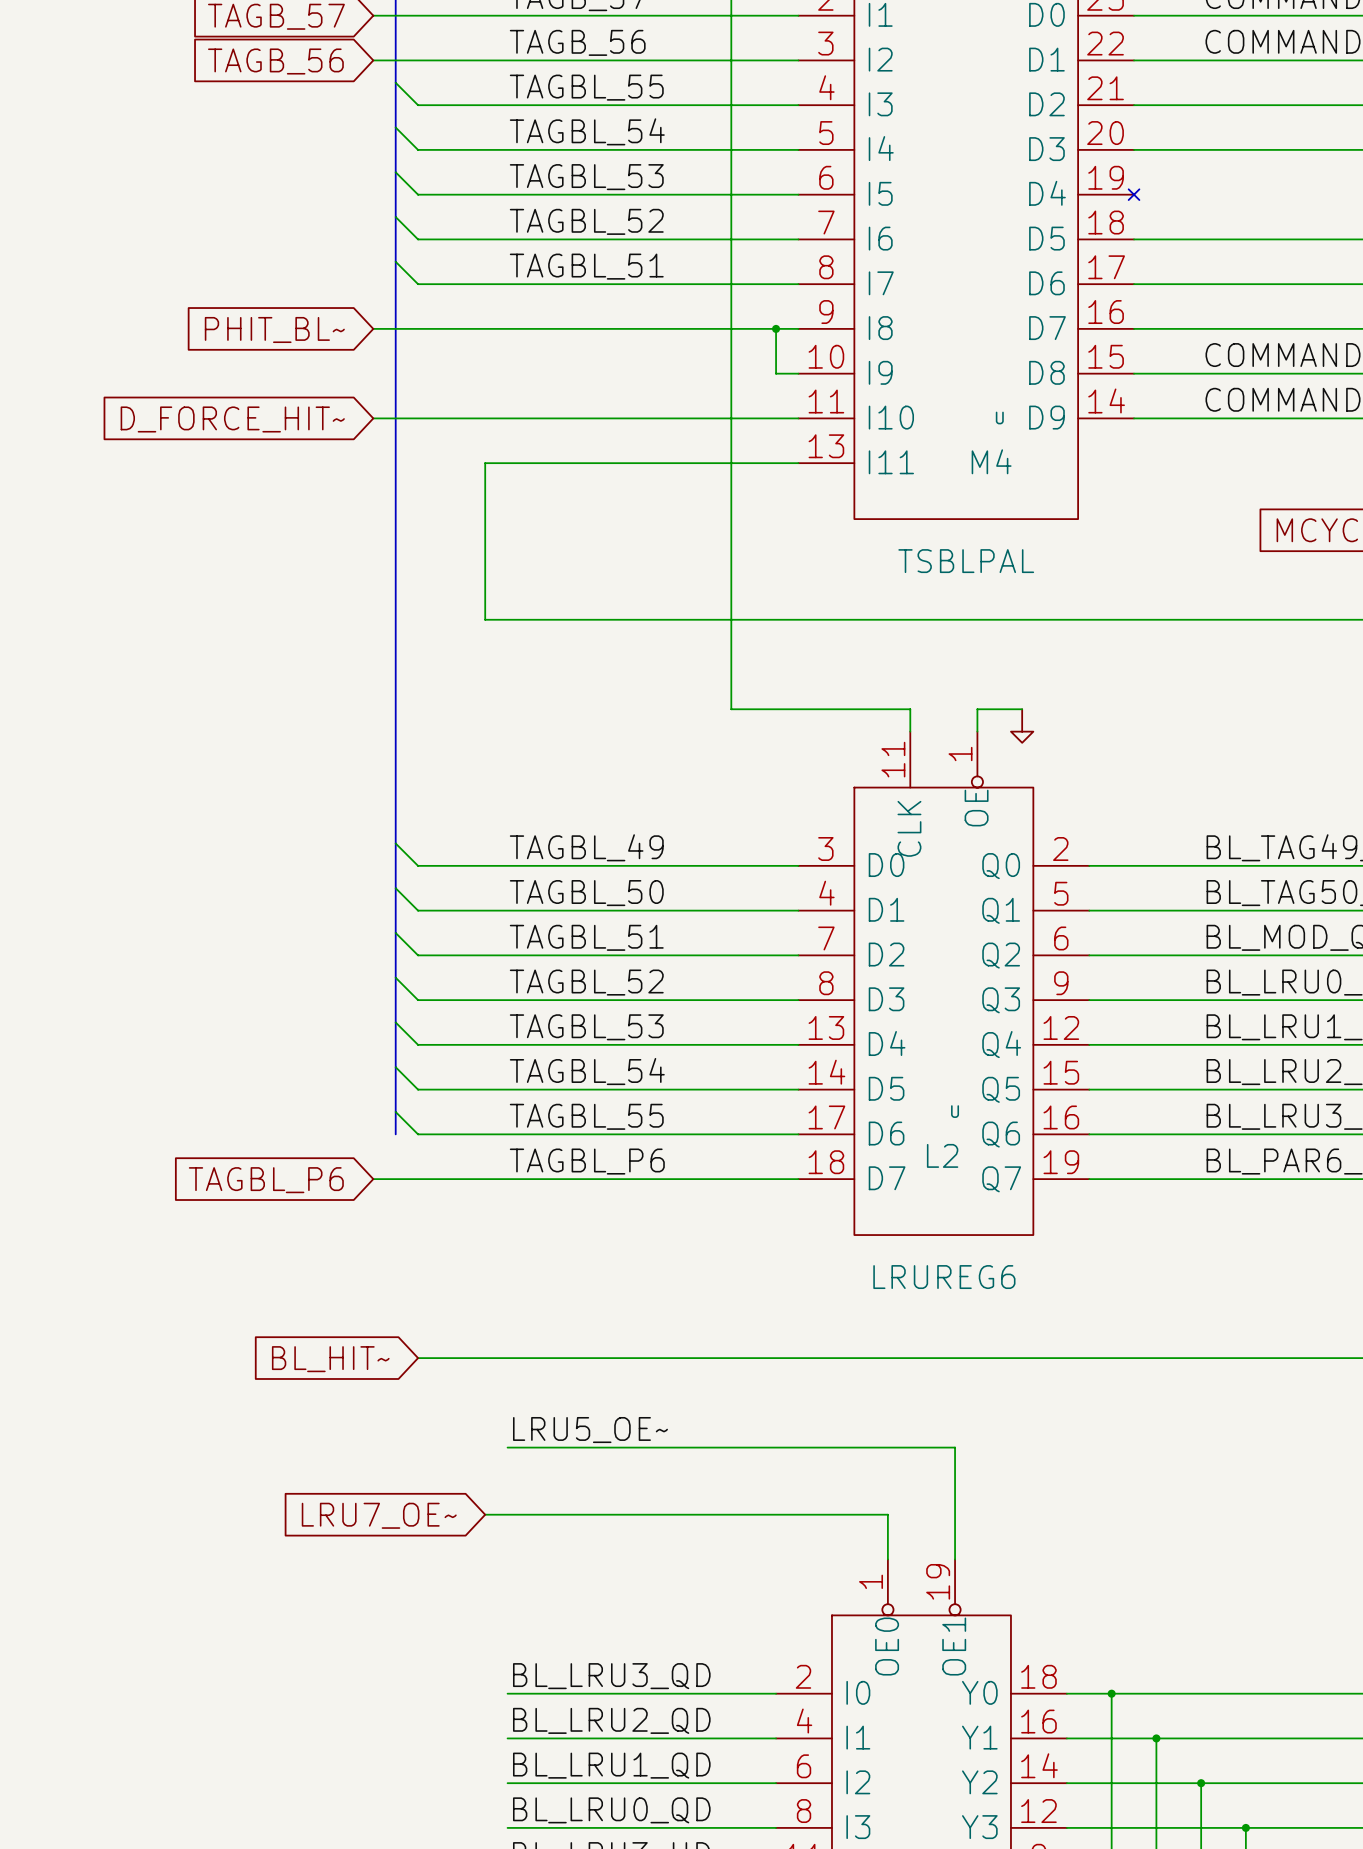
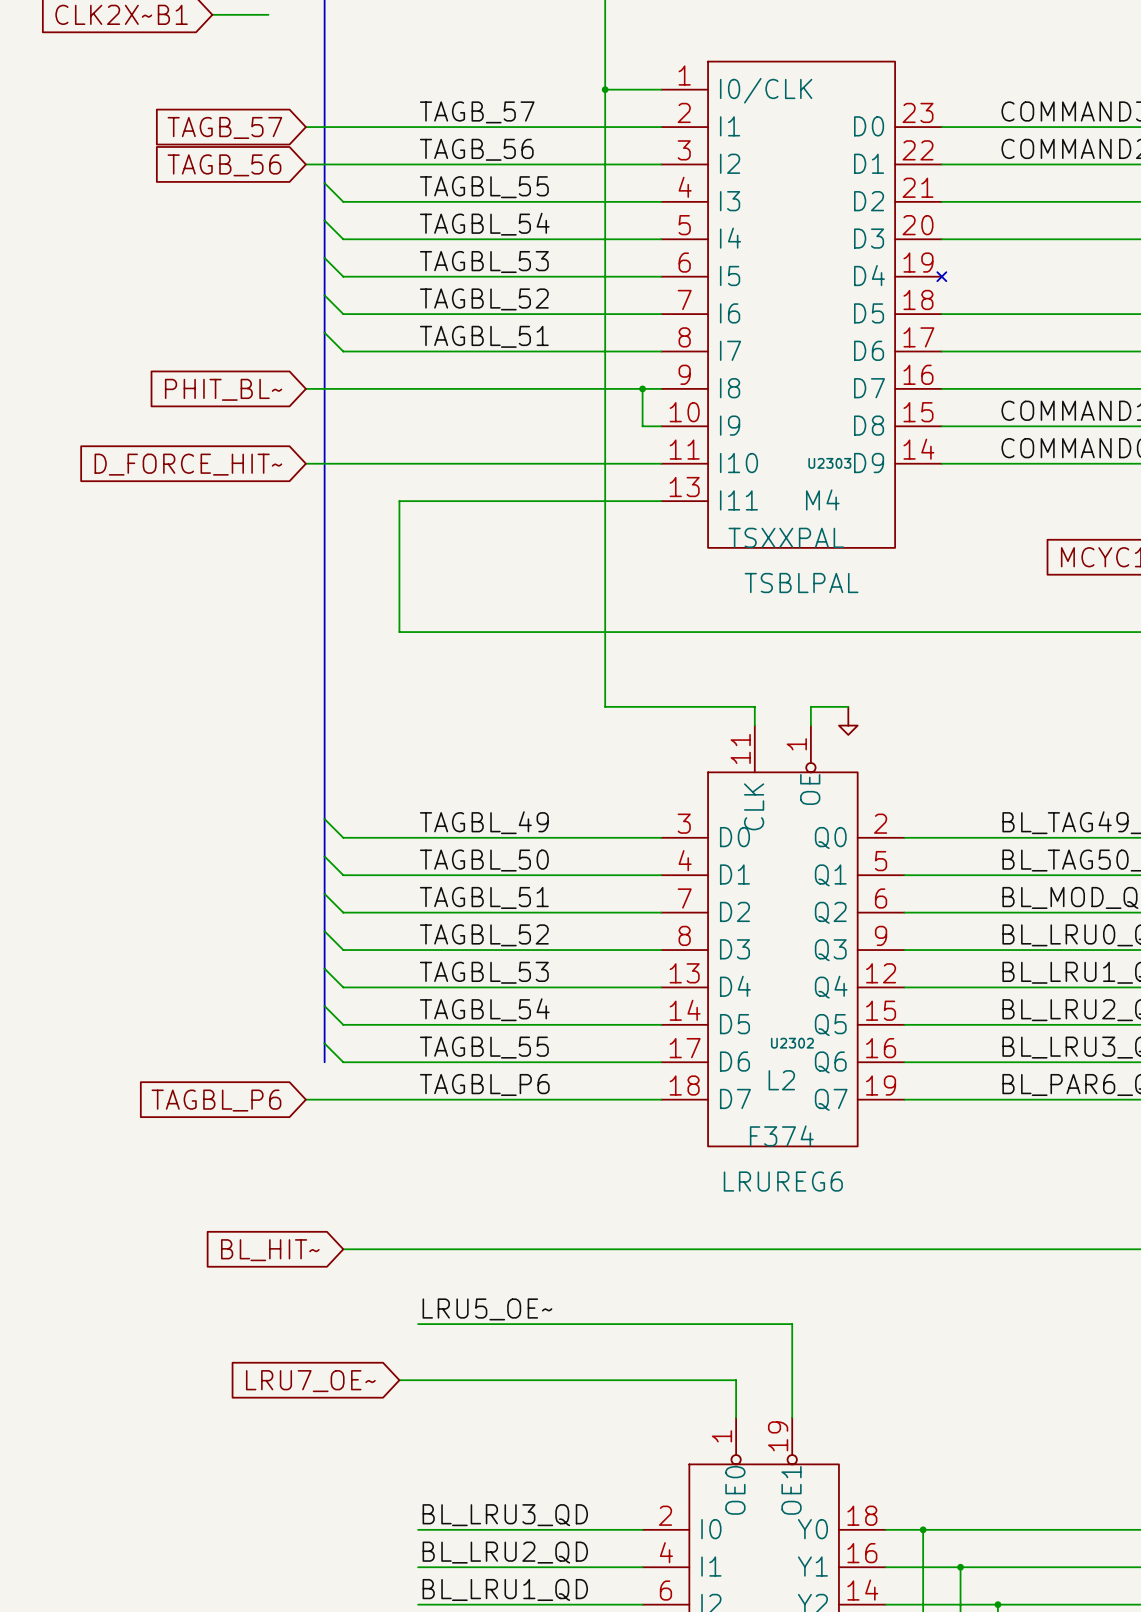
U name: U (999, 417) -> U2303 (829, 463)
U value: none -> TSXXPAL (786, 537)
U name: U (955, 1111) -> U2302 (792, 1043)
U value: none -> F374 (781, 1135)

